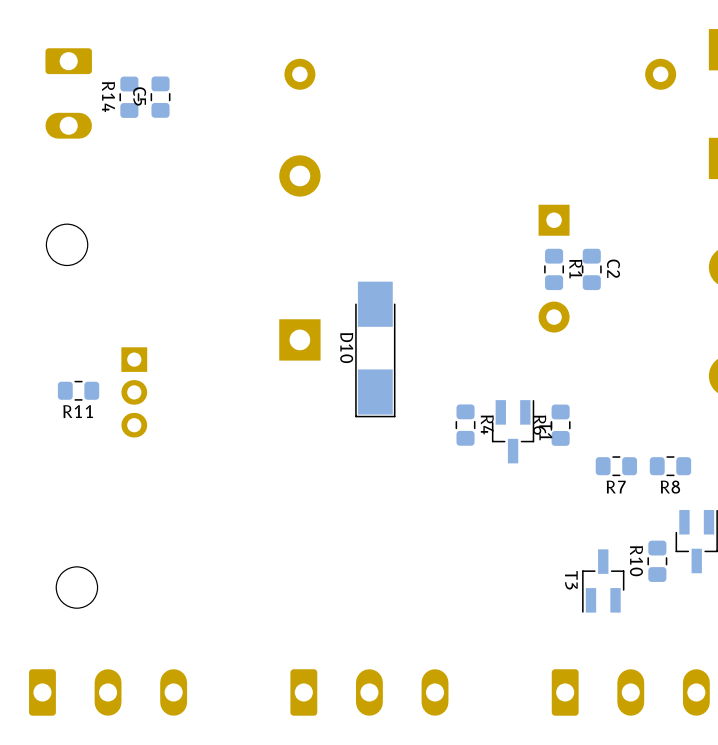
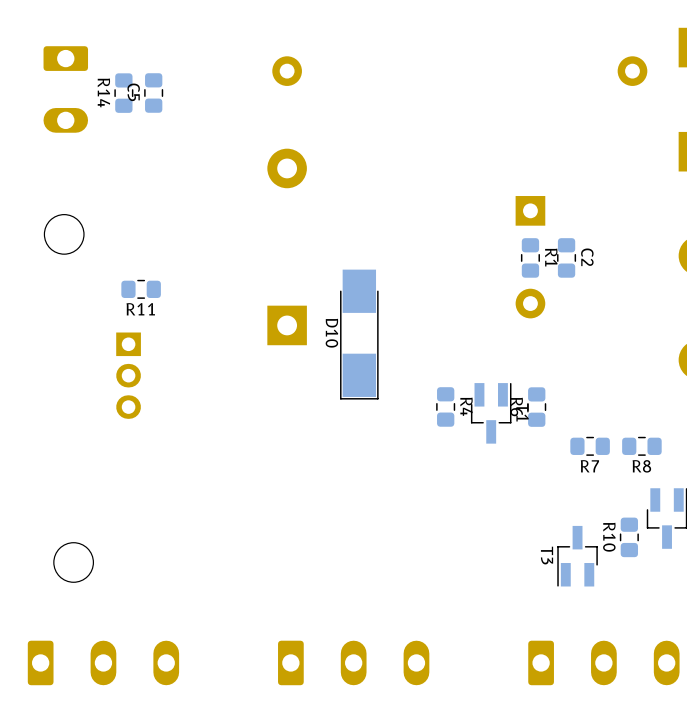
R11 position: (78, 390) -> (141, 289)

